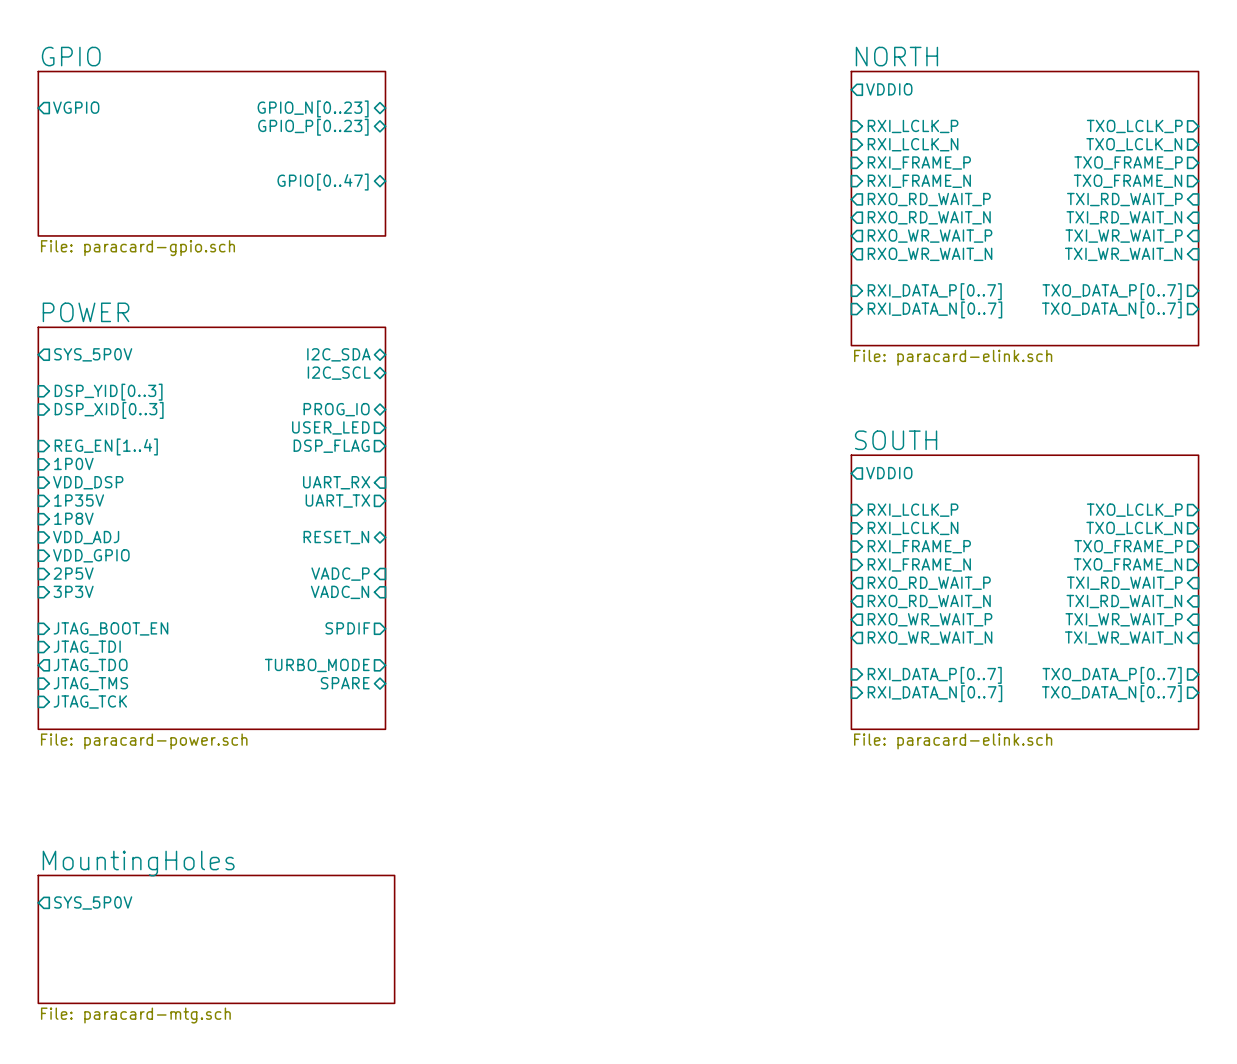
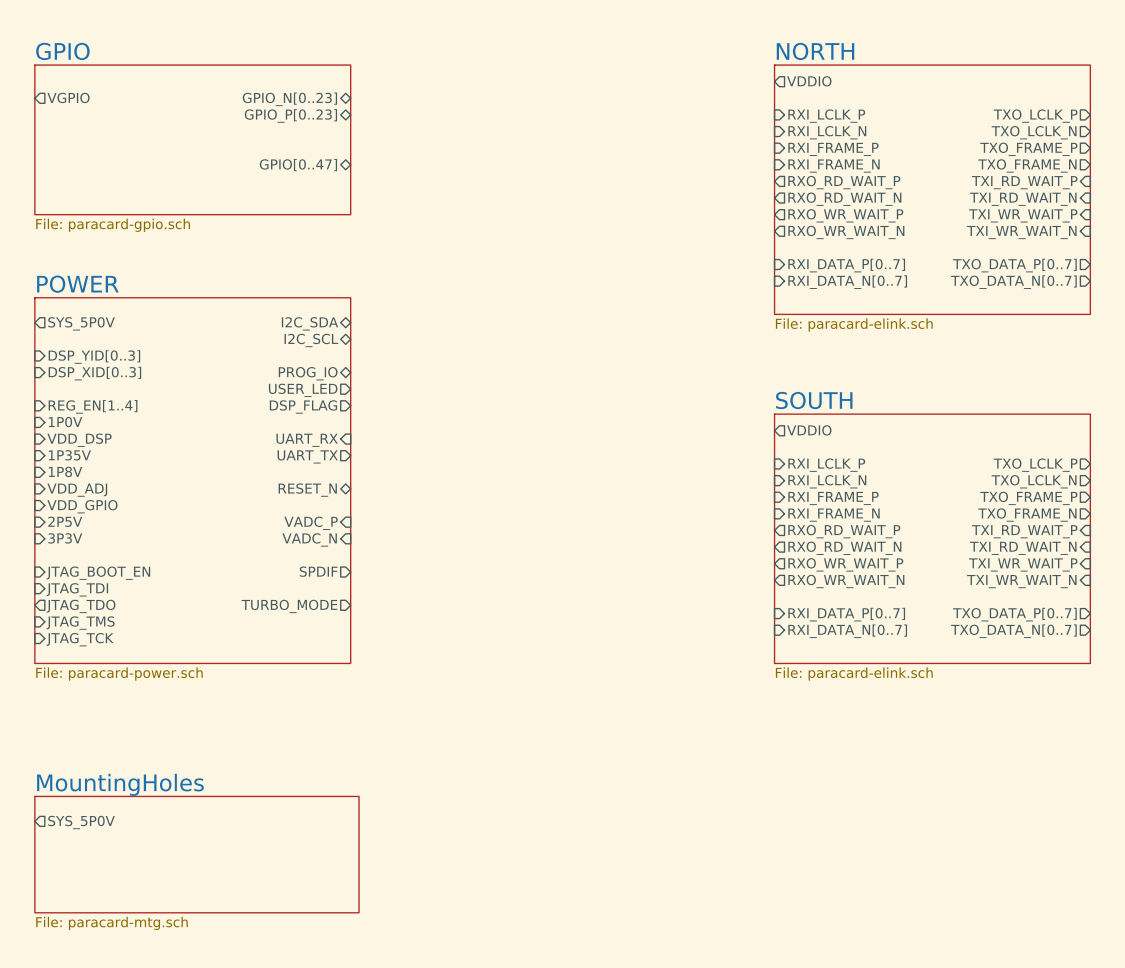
sheet pin: SPARE (345, 683) -> none

